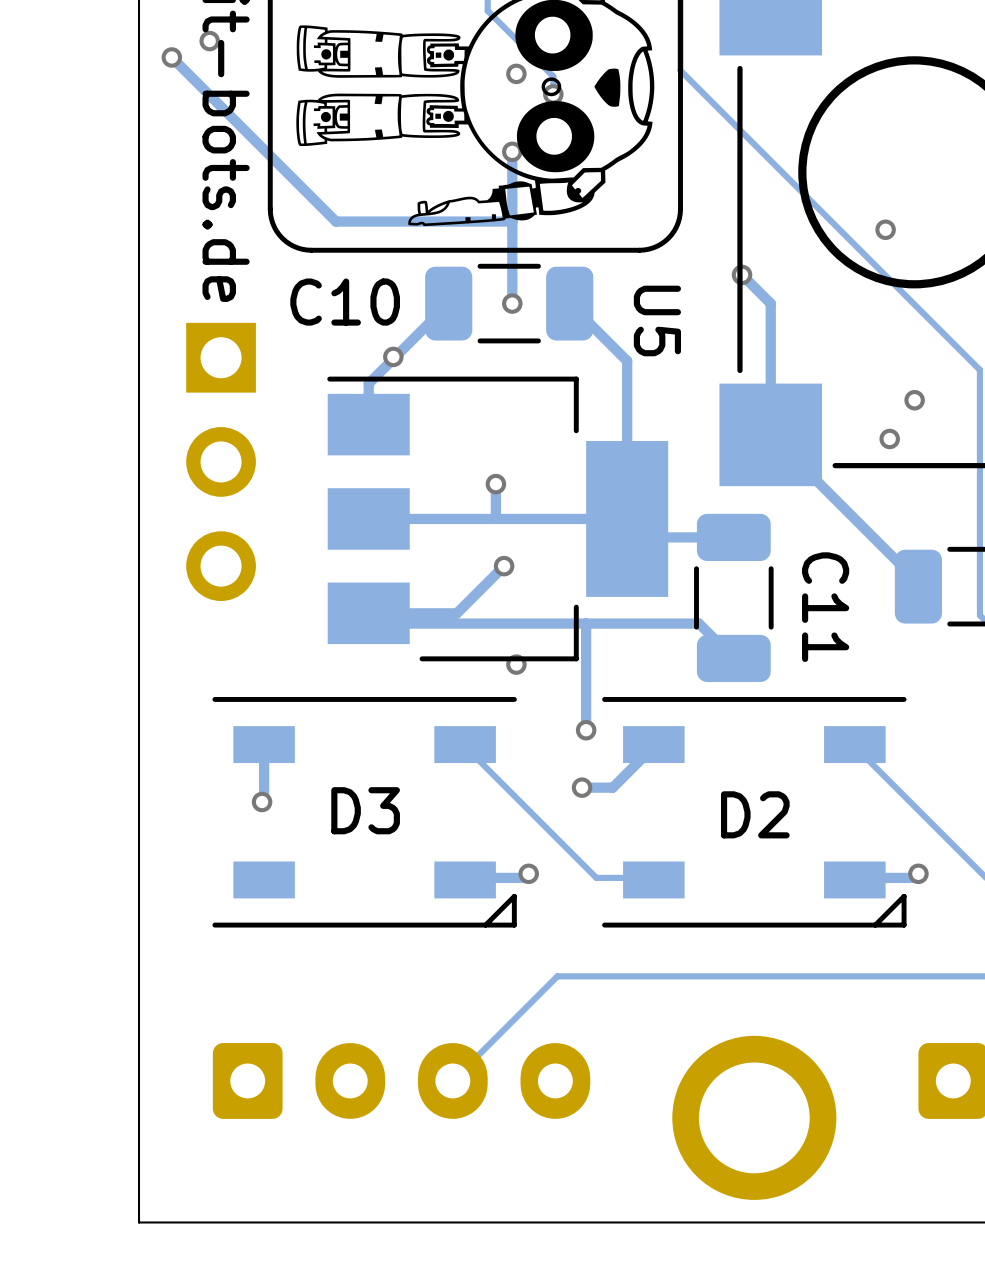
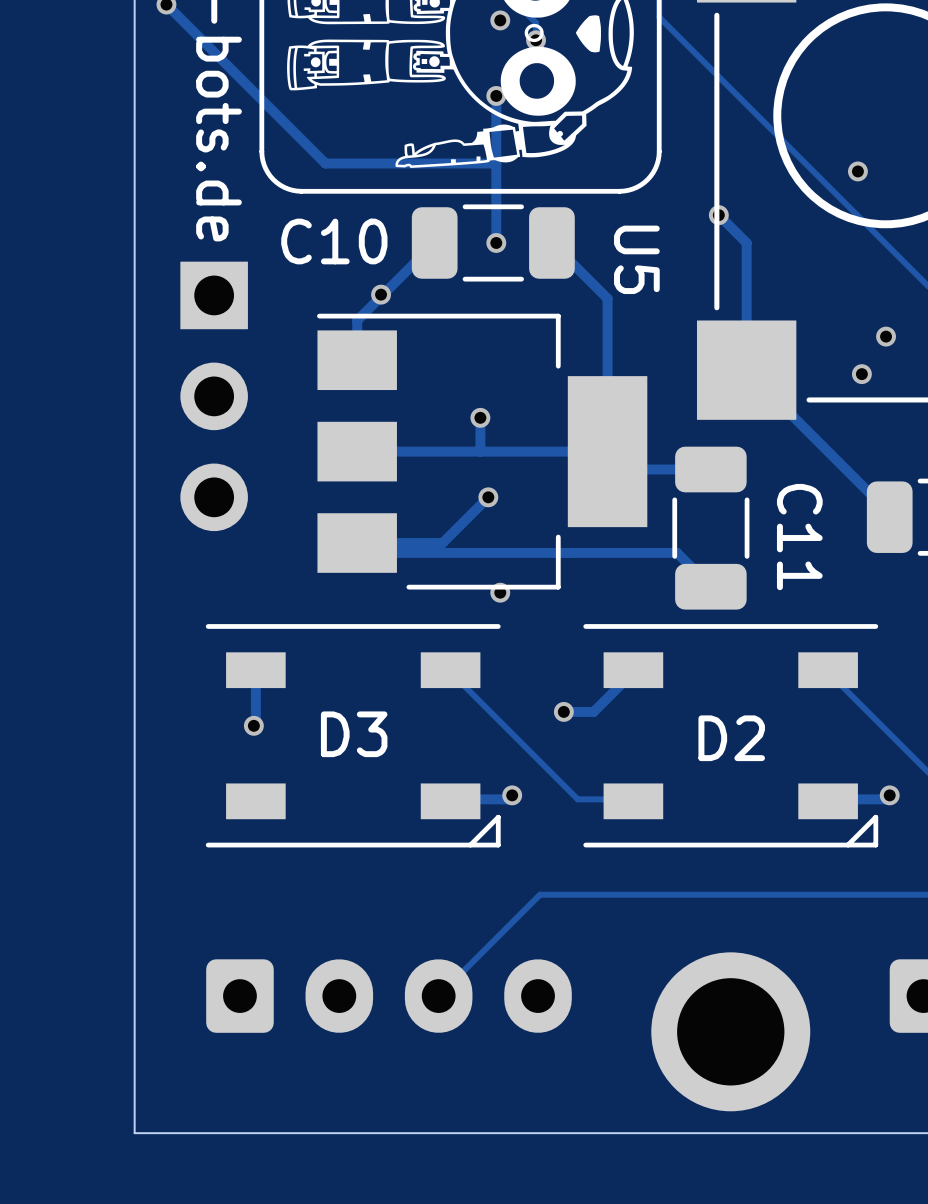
track: (586, 623) (586, 730) -> none
via: (586, 730) -> none

